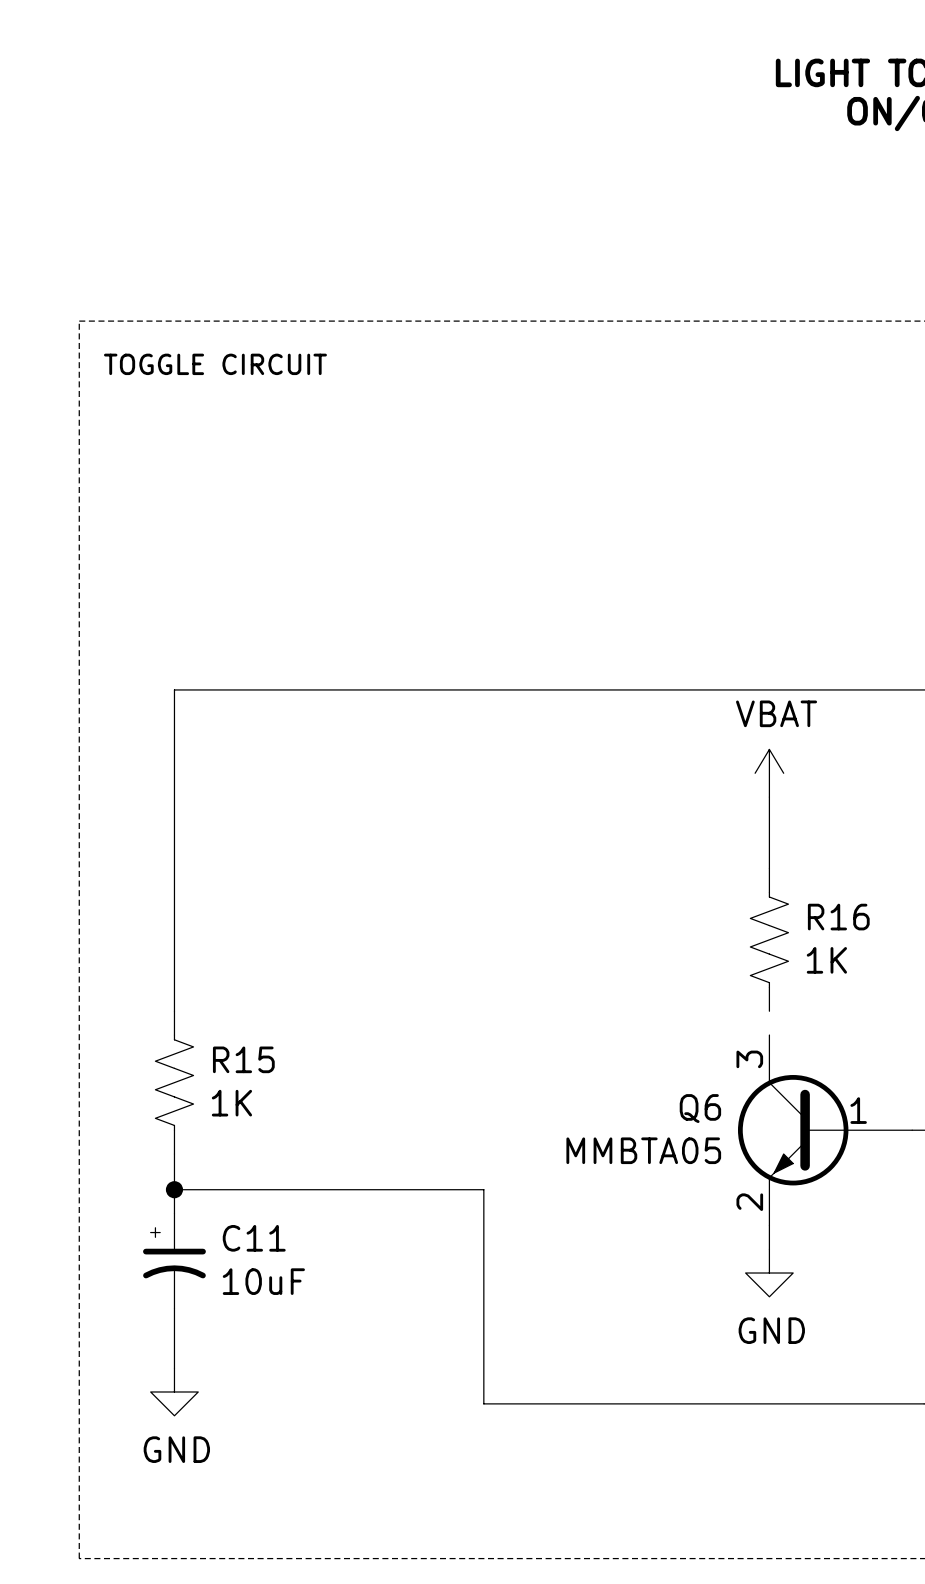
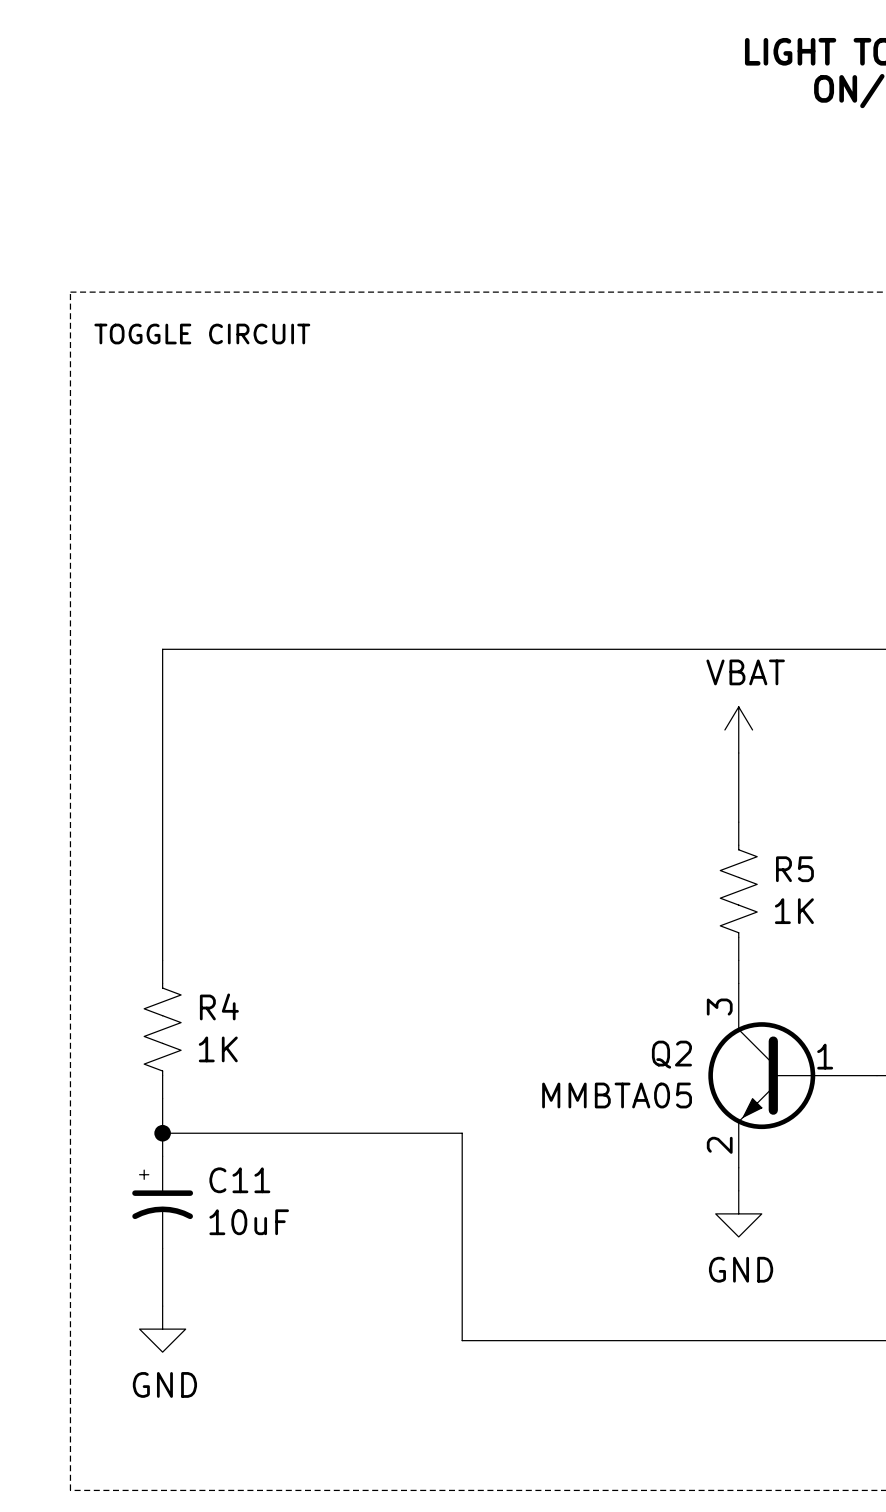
R16 name: R16 (838, 917) -> R5 (794, 869)
wire: none -> (738, 960) (738, 983)
R15 name: R15 (243, 1059) -> R4 (219, 1006)
Q6 name: Q6 (700, 1108) -> Q2 (671, 1054)

